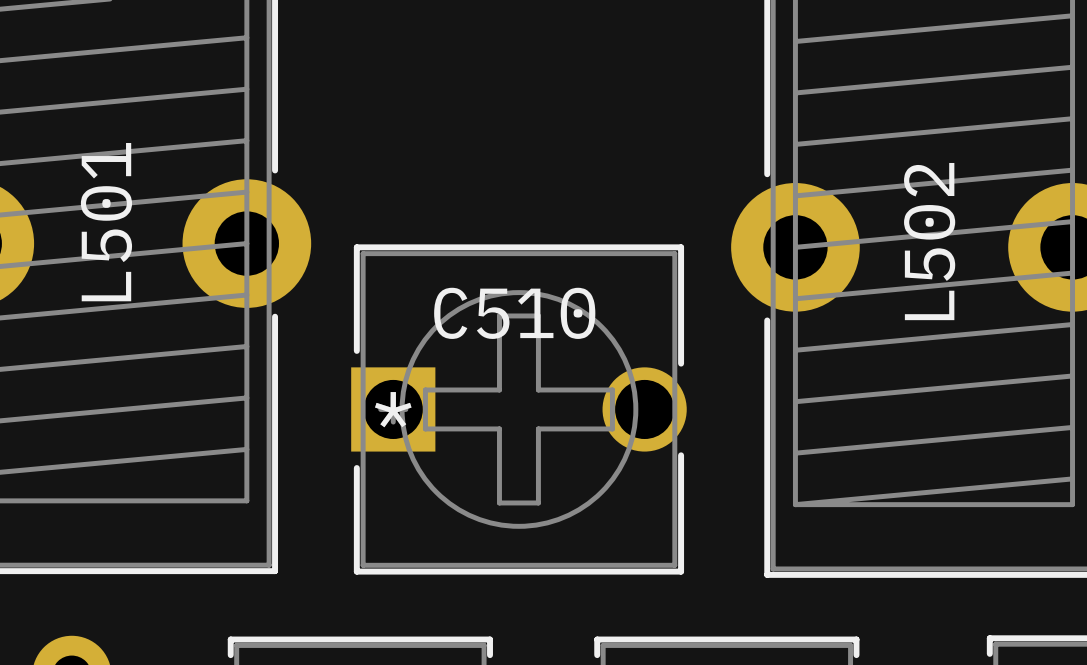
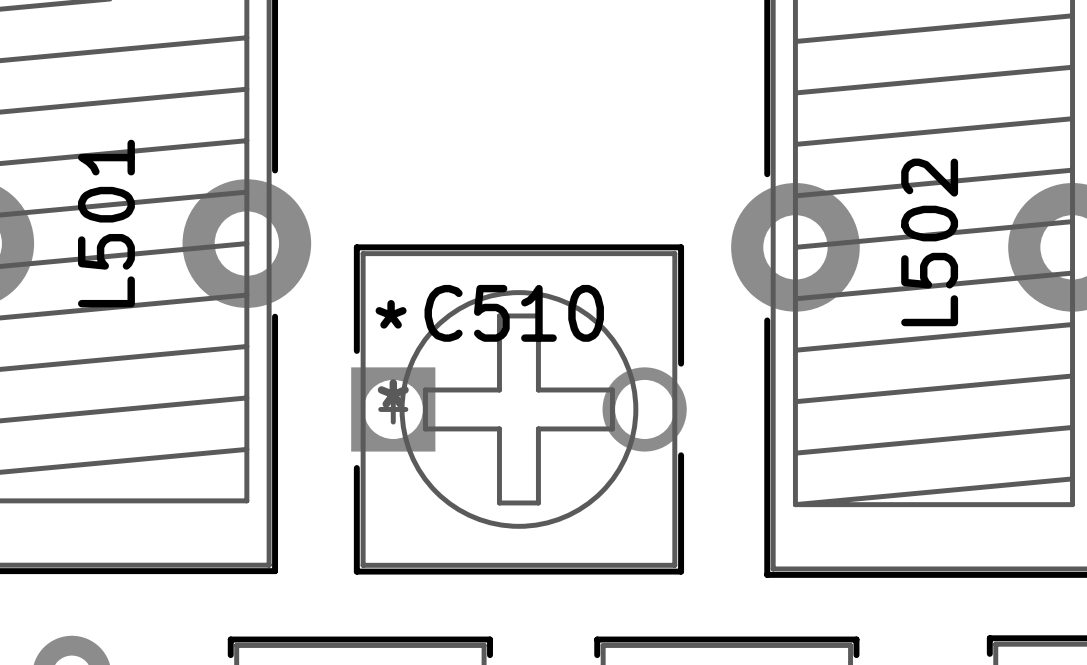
C510 footprint: [351, 244, 687, 575] -> [351, 244, 687, 575]

